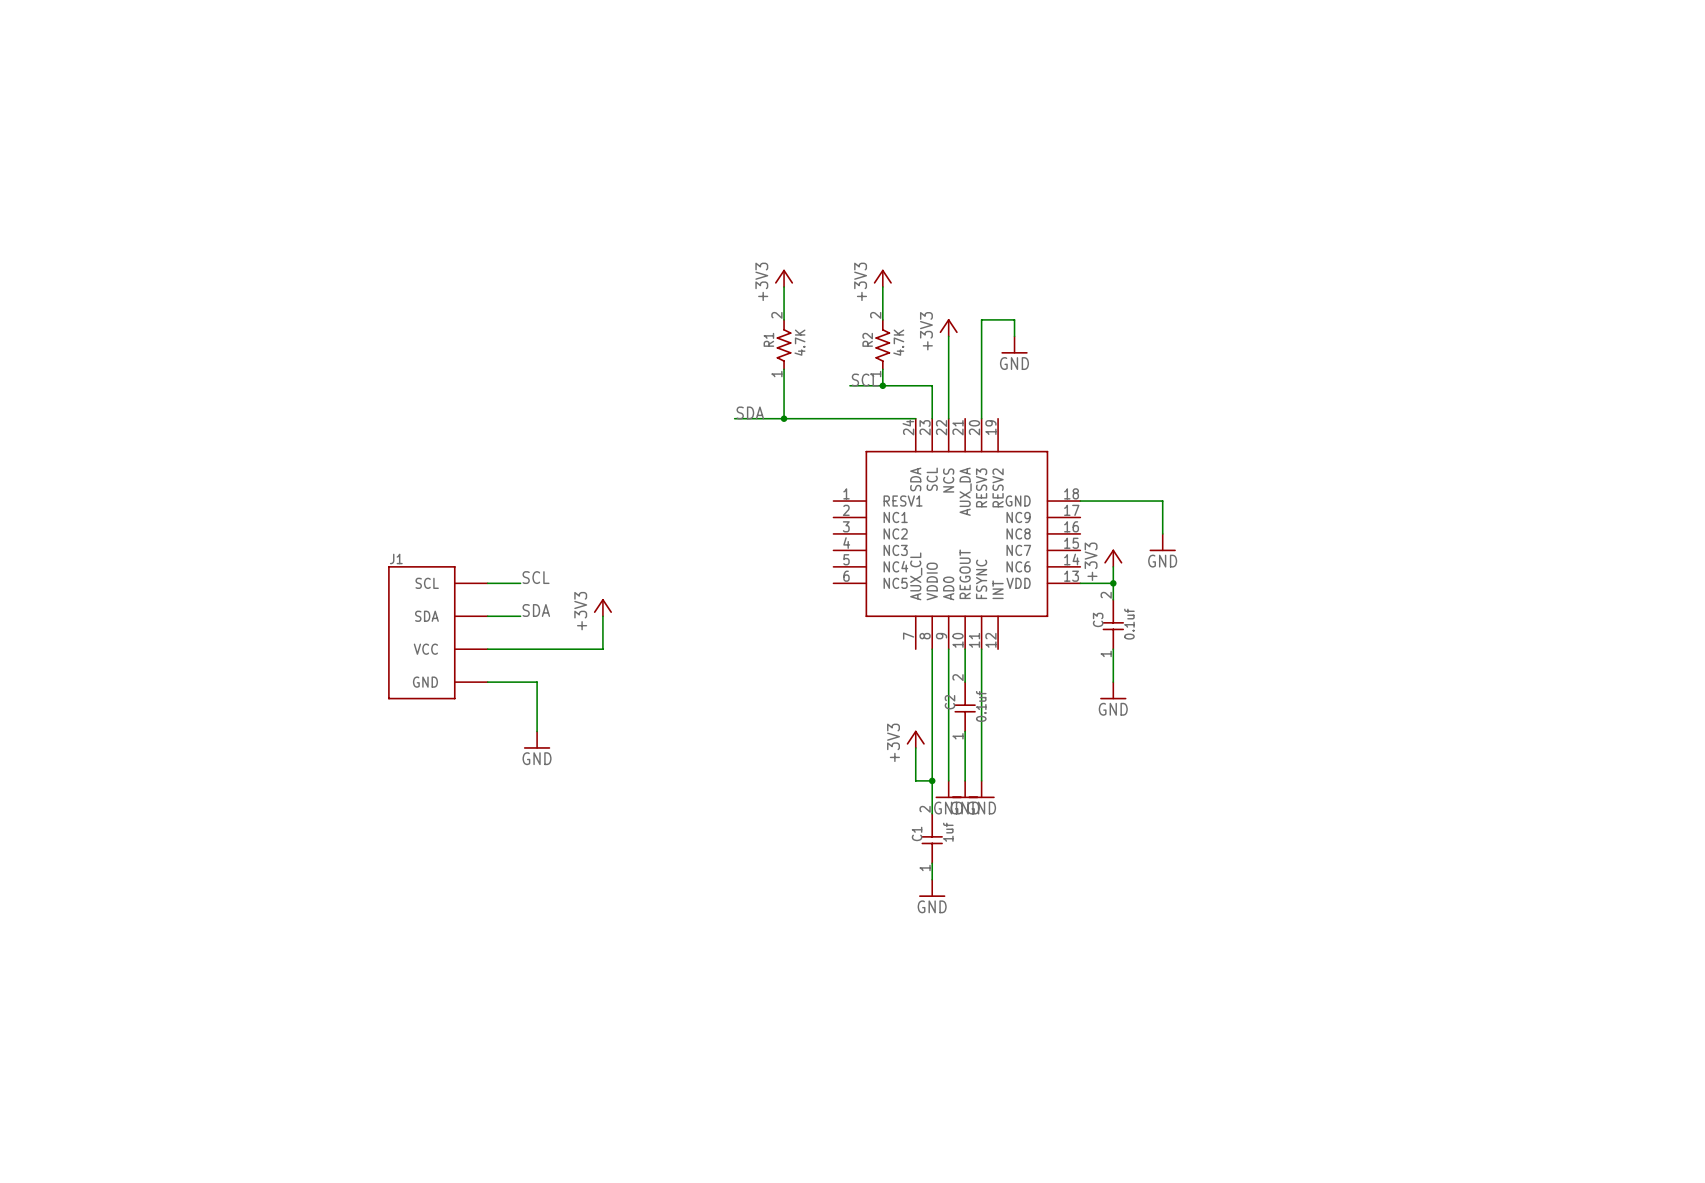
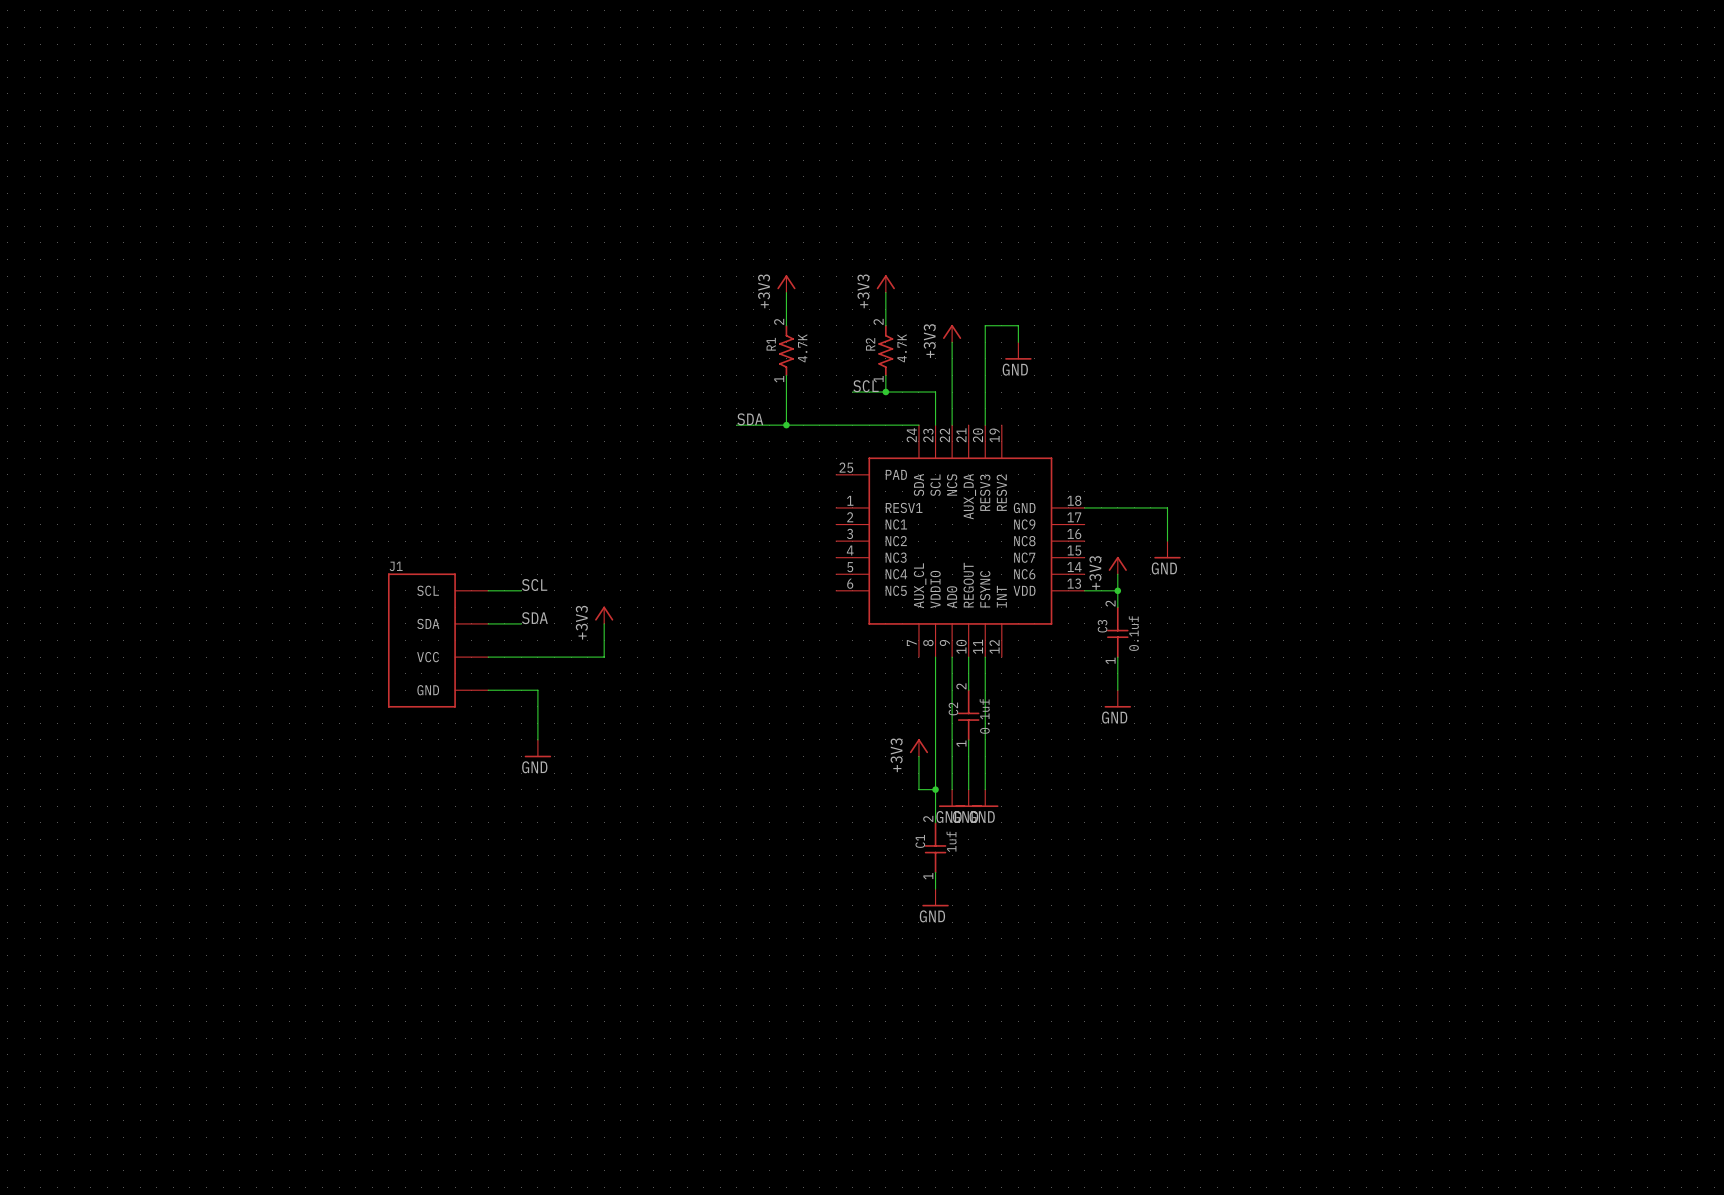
part symbol: [833, 418, 1081, 650] -> [836, 425, 1085, 658]

